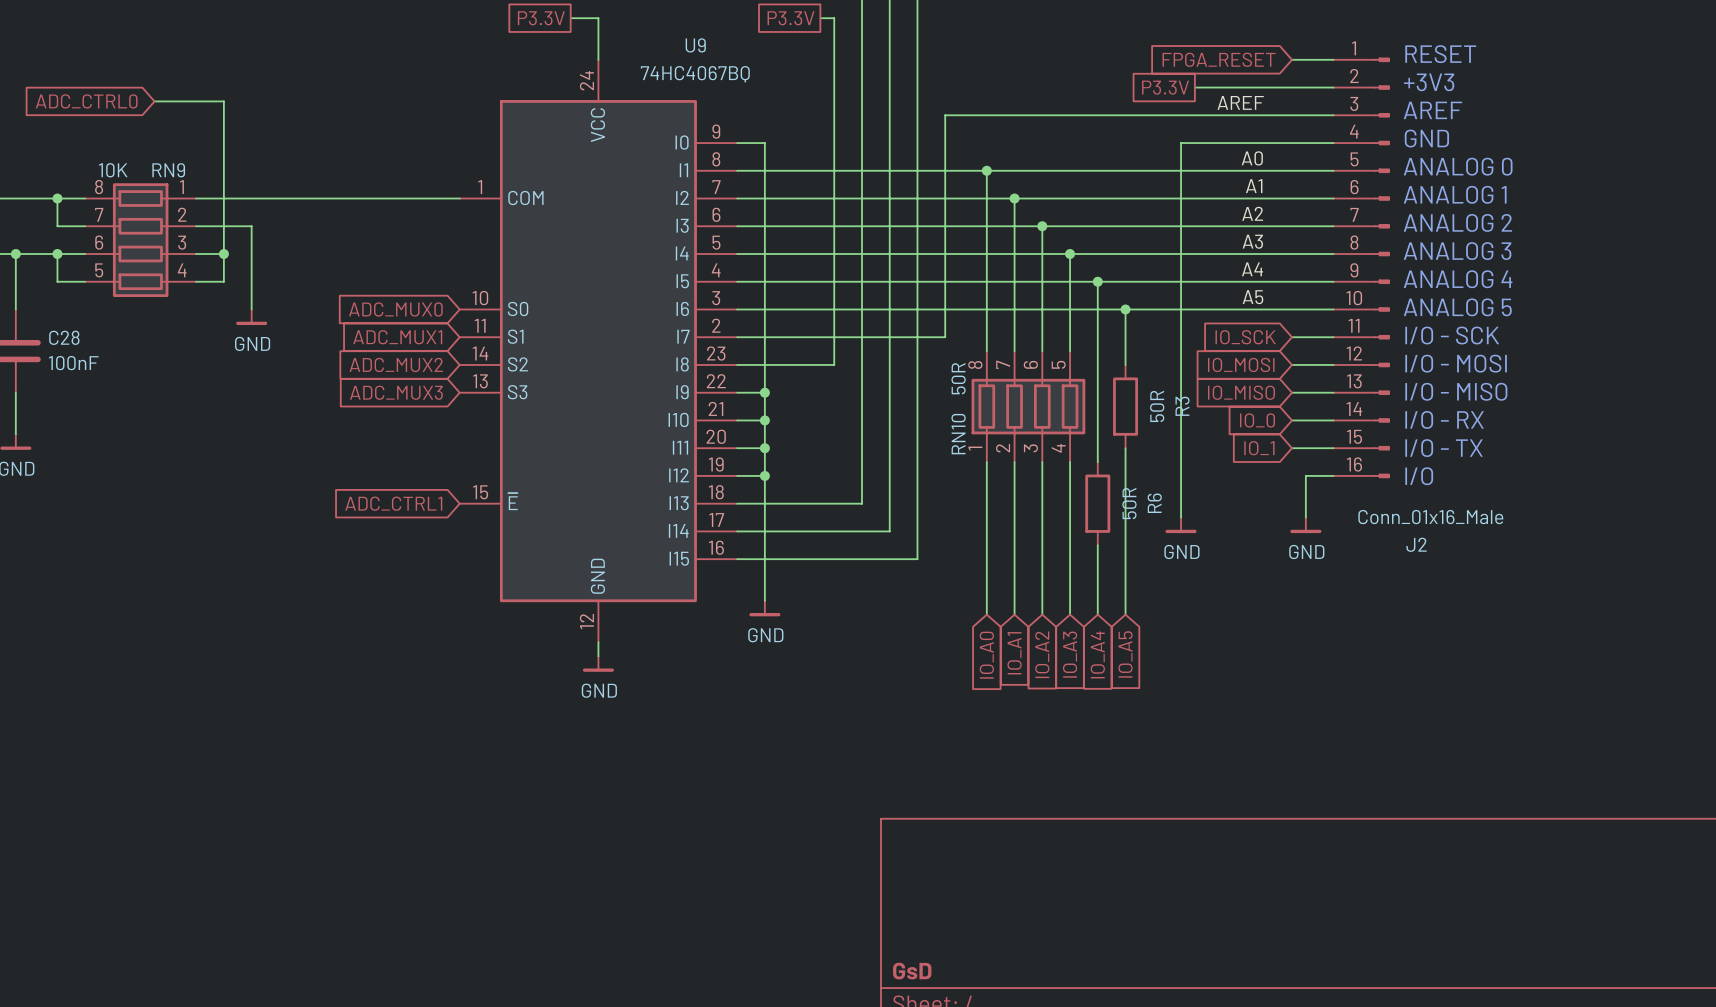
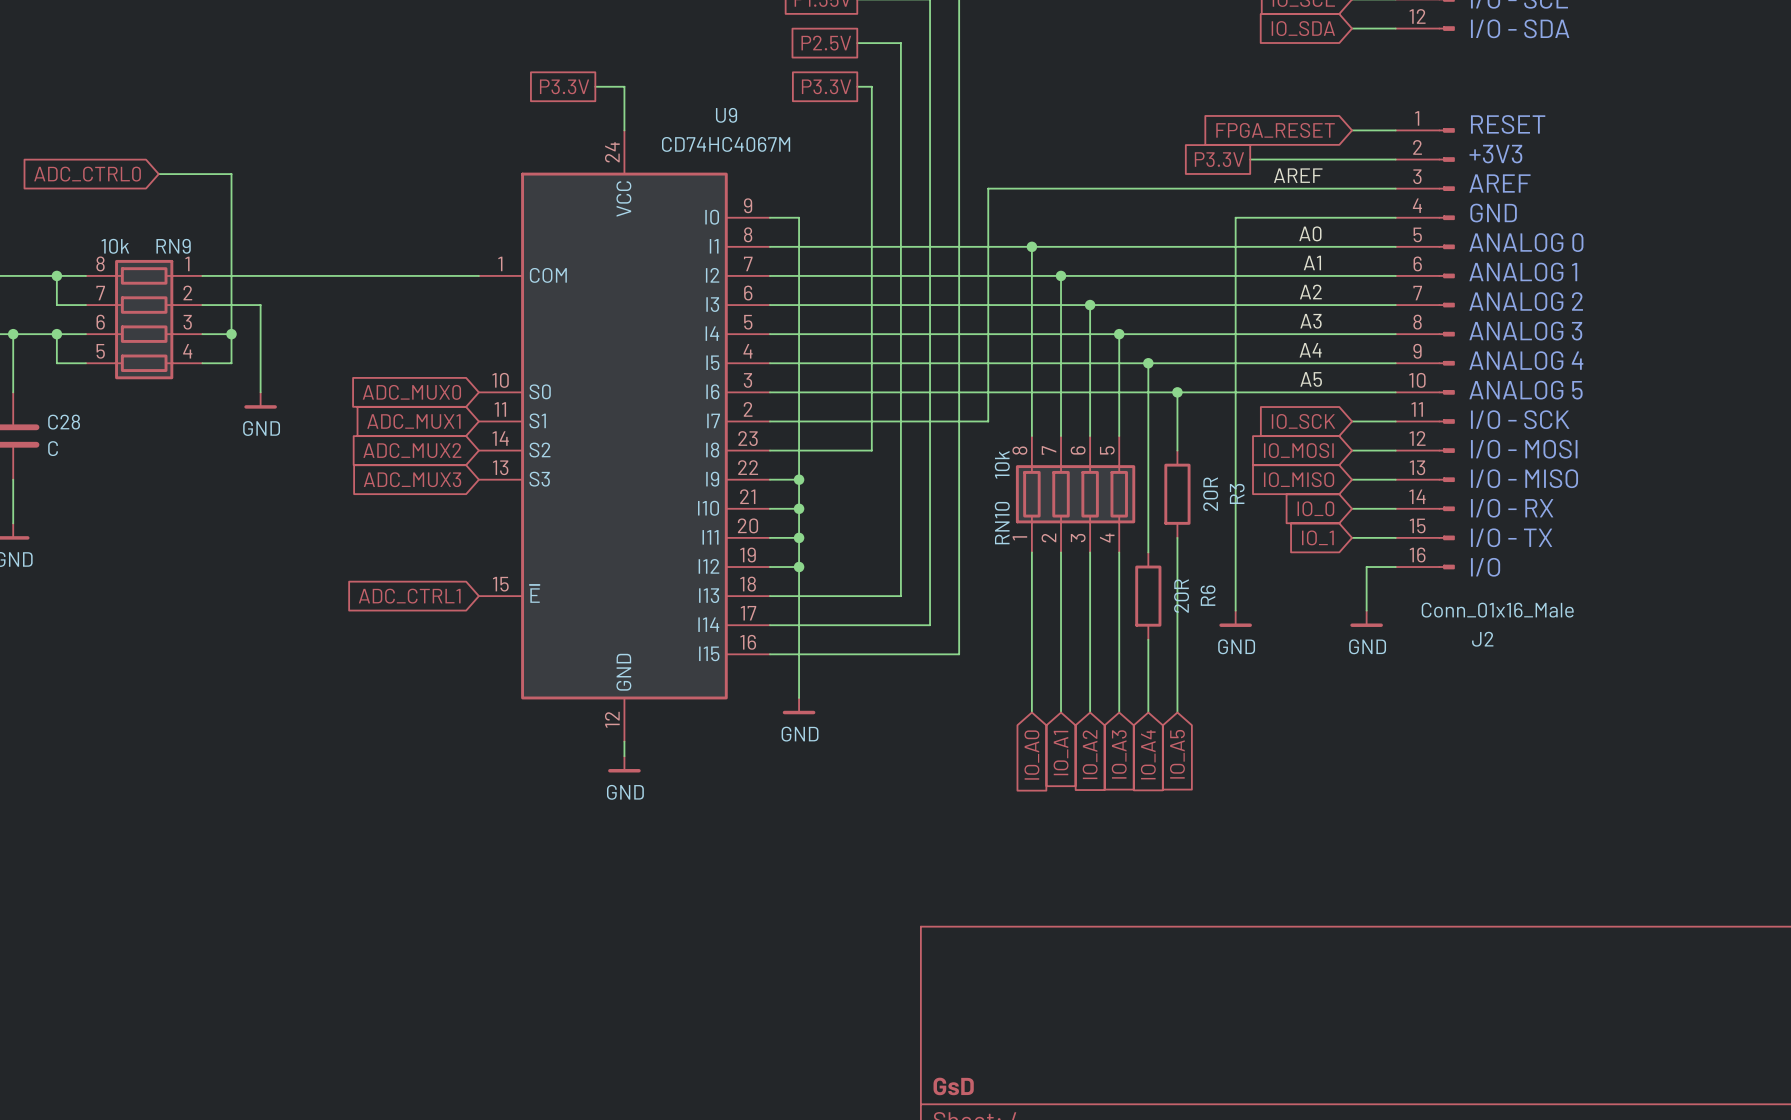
U9 value: 74HC4067BQ (695, 74) -> CD74HC4067M (726, 144)
RN9 value: 10K (113, 170) -> 10k (115, 246)
C28 value: 100nF (73, 363) -> C (53, 448)
RN10 value: 50R (958, 378) -> 10k (1002, 464)
R3 value: 50R (1157, 406) -> 20R (1210, 494)
R6 value: 50R (1129, 503) -> 20R (1181, 596)

